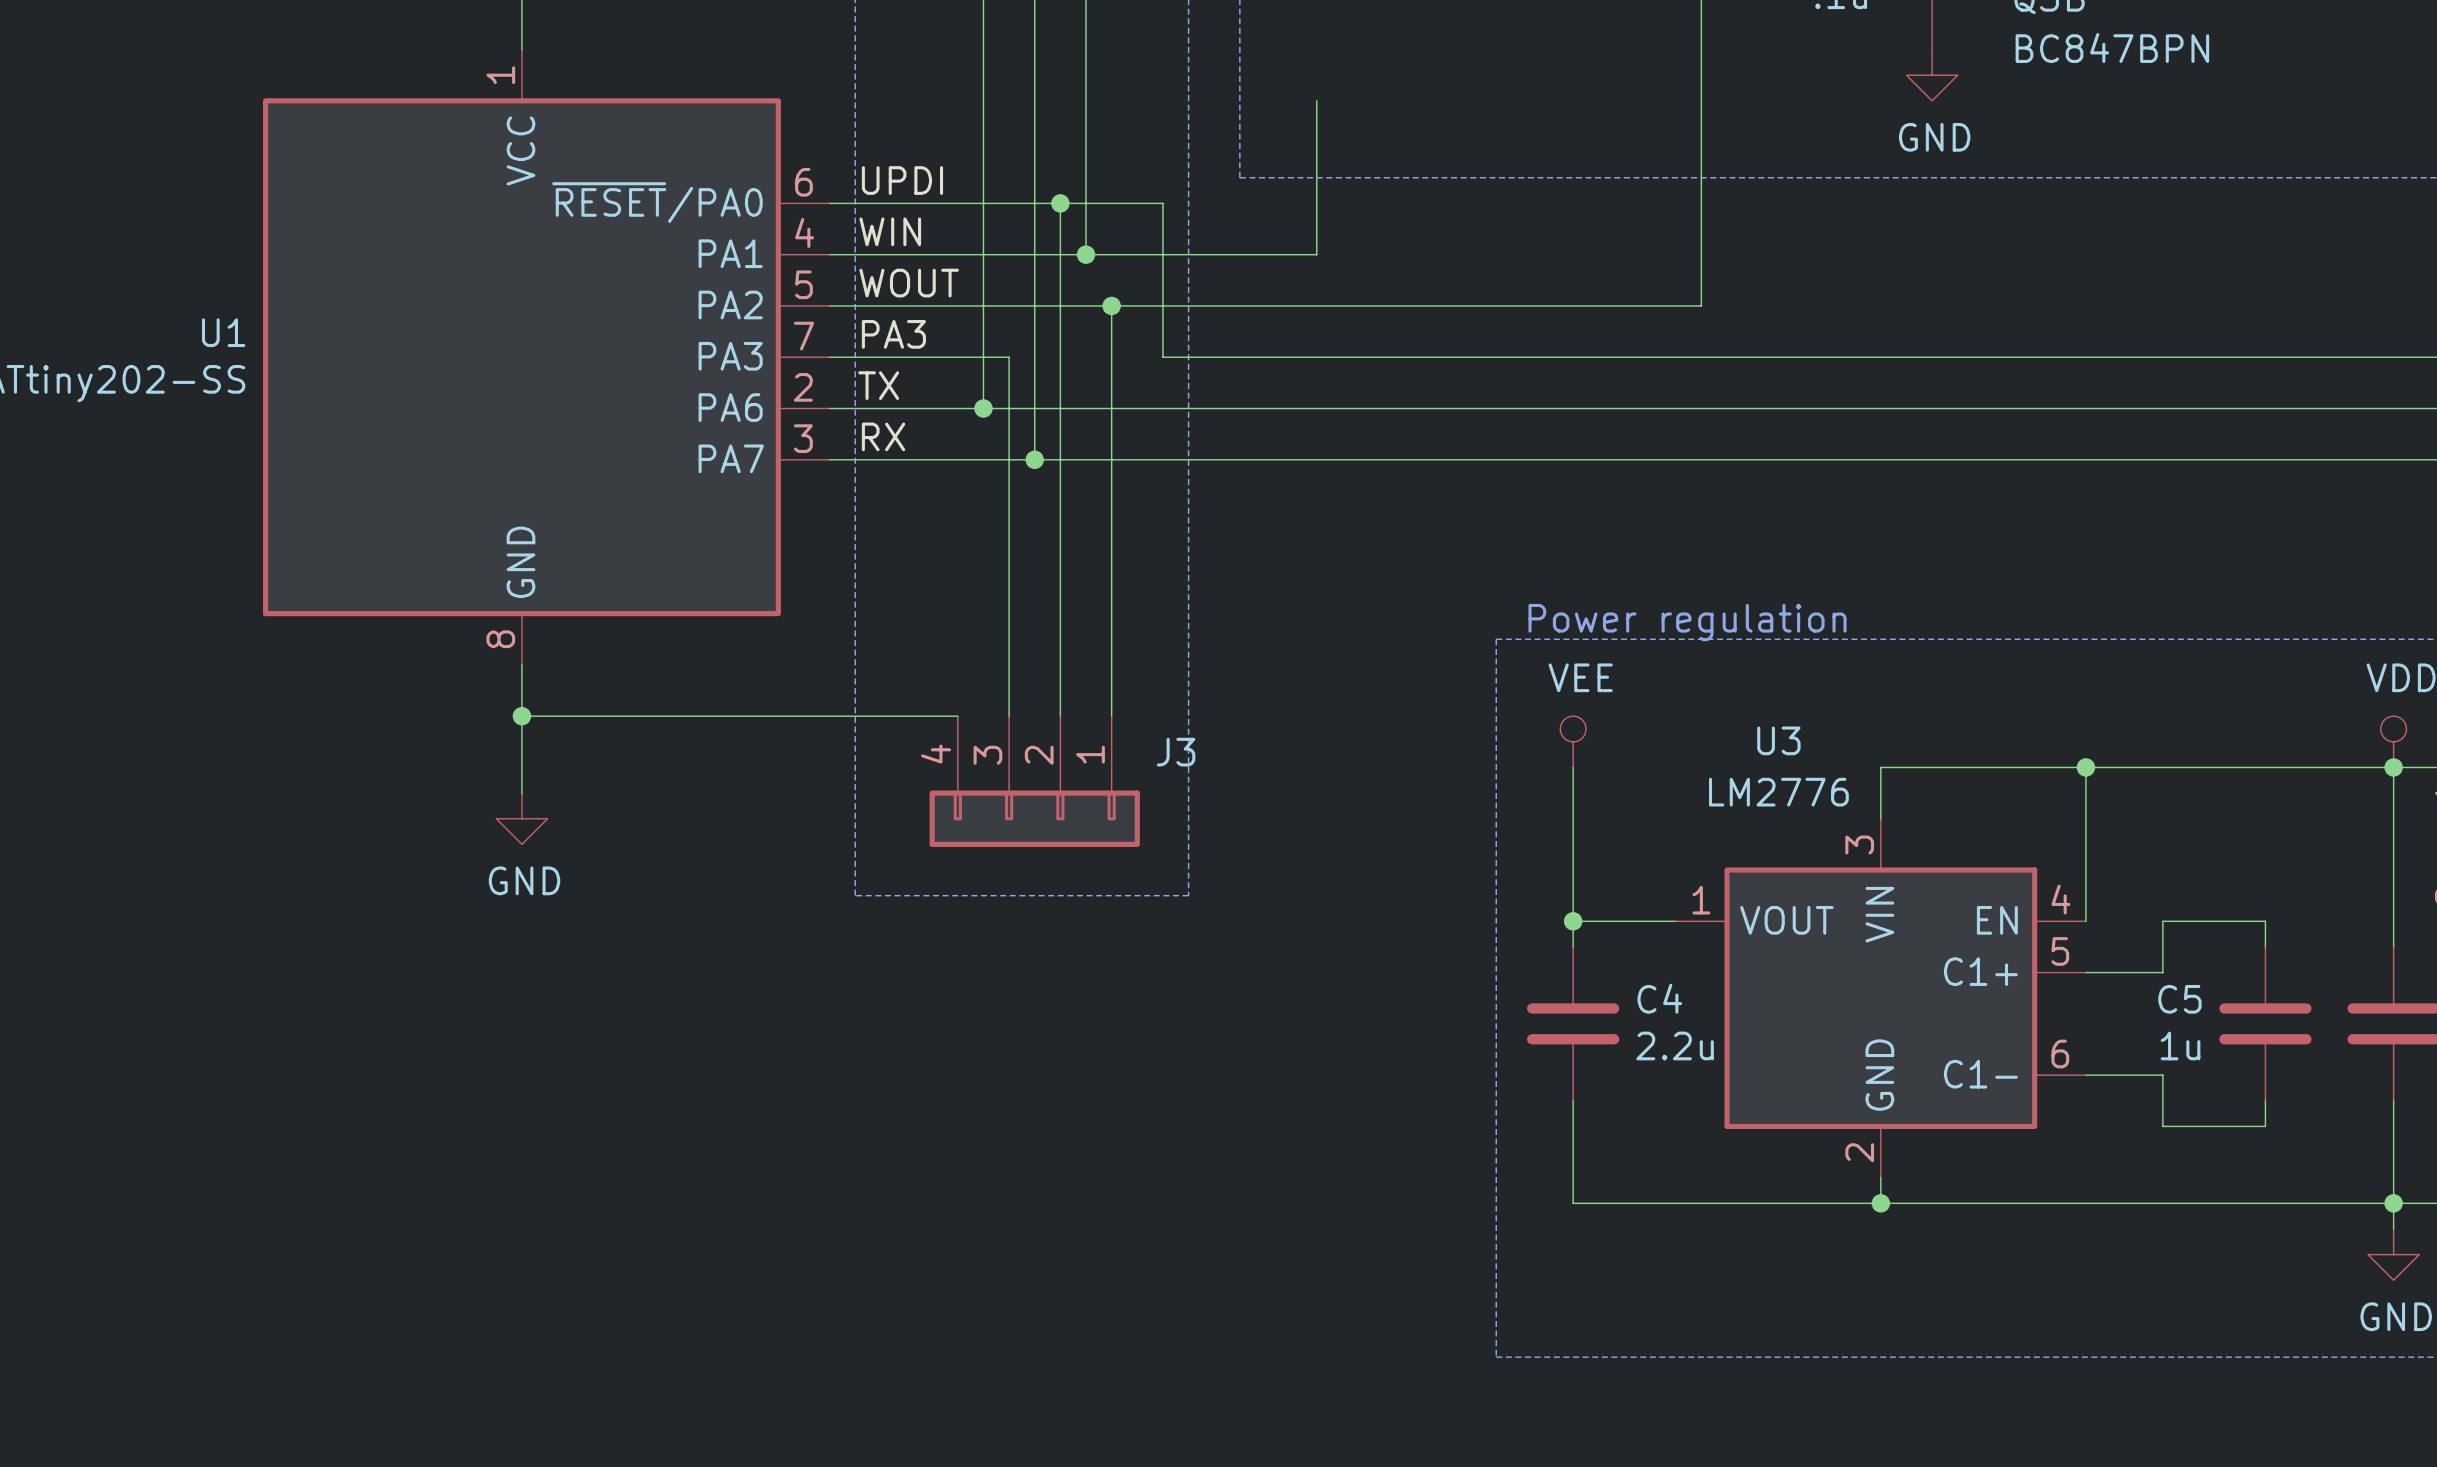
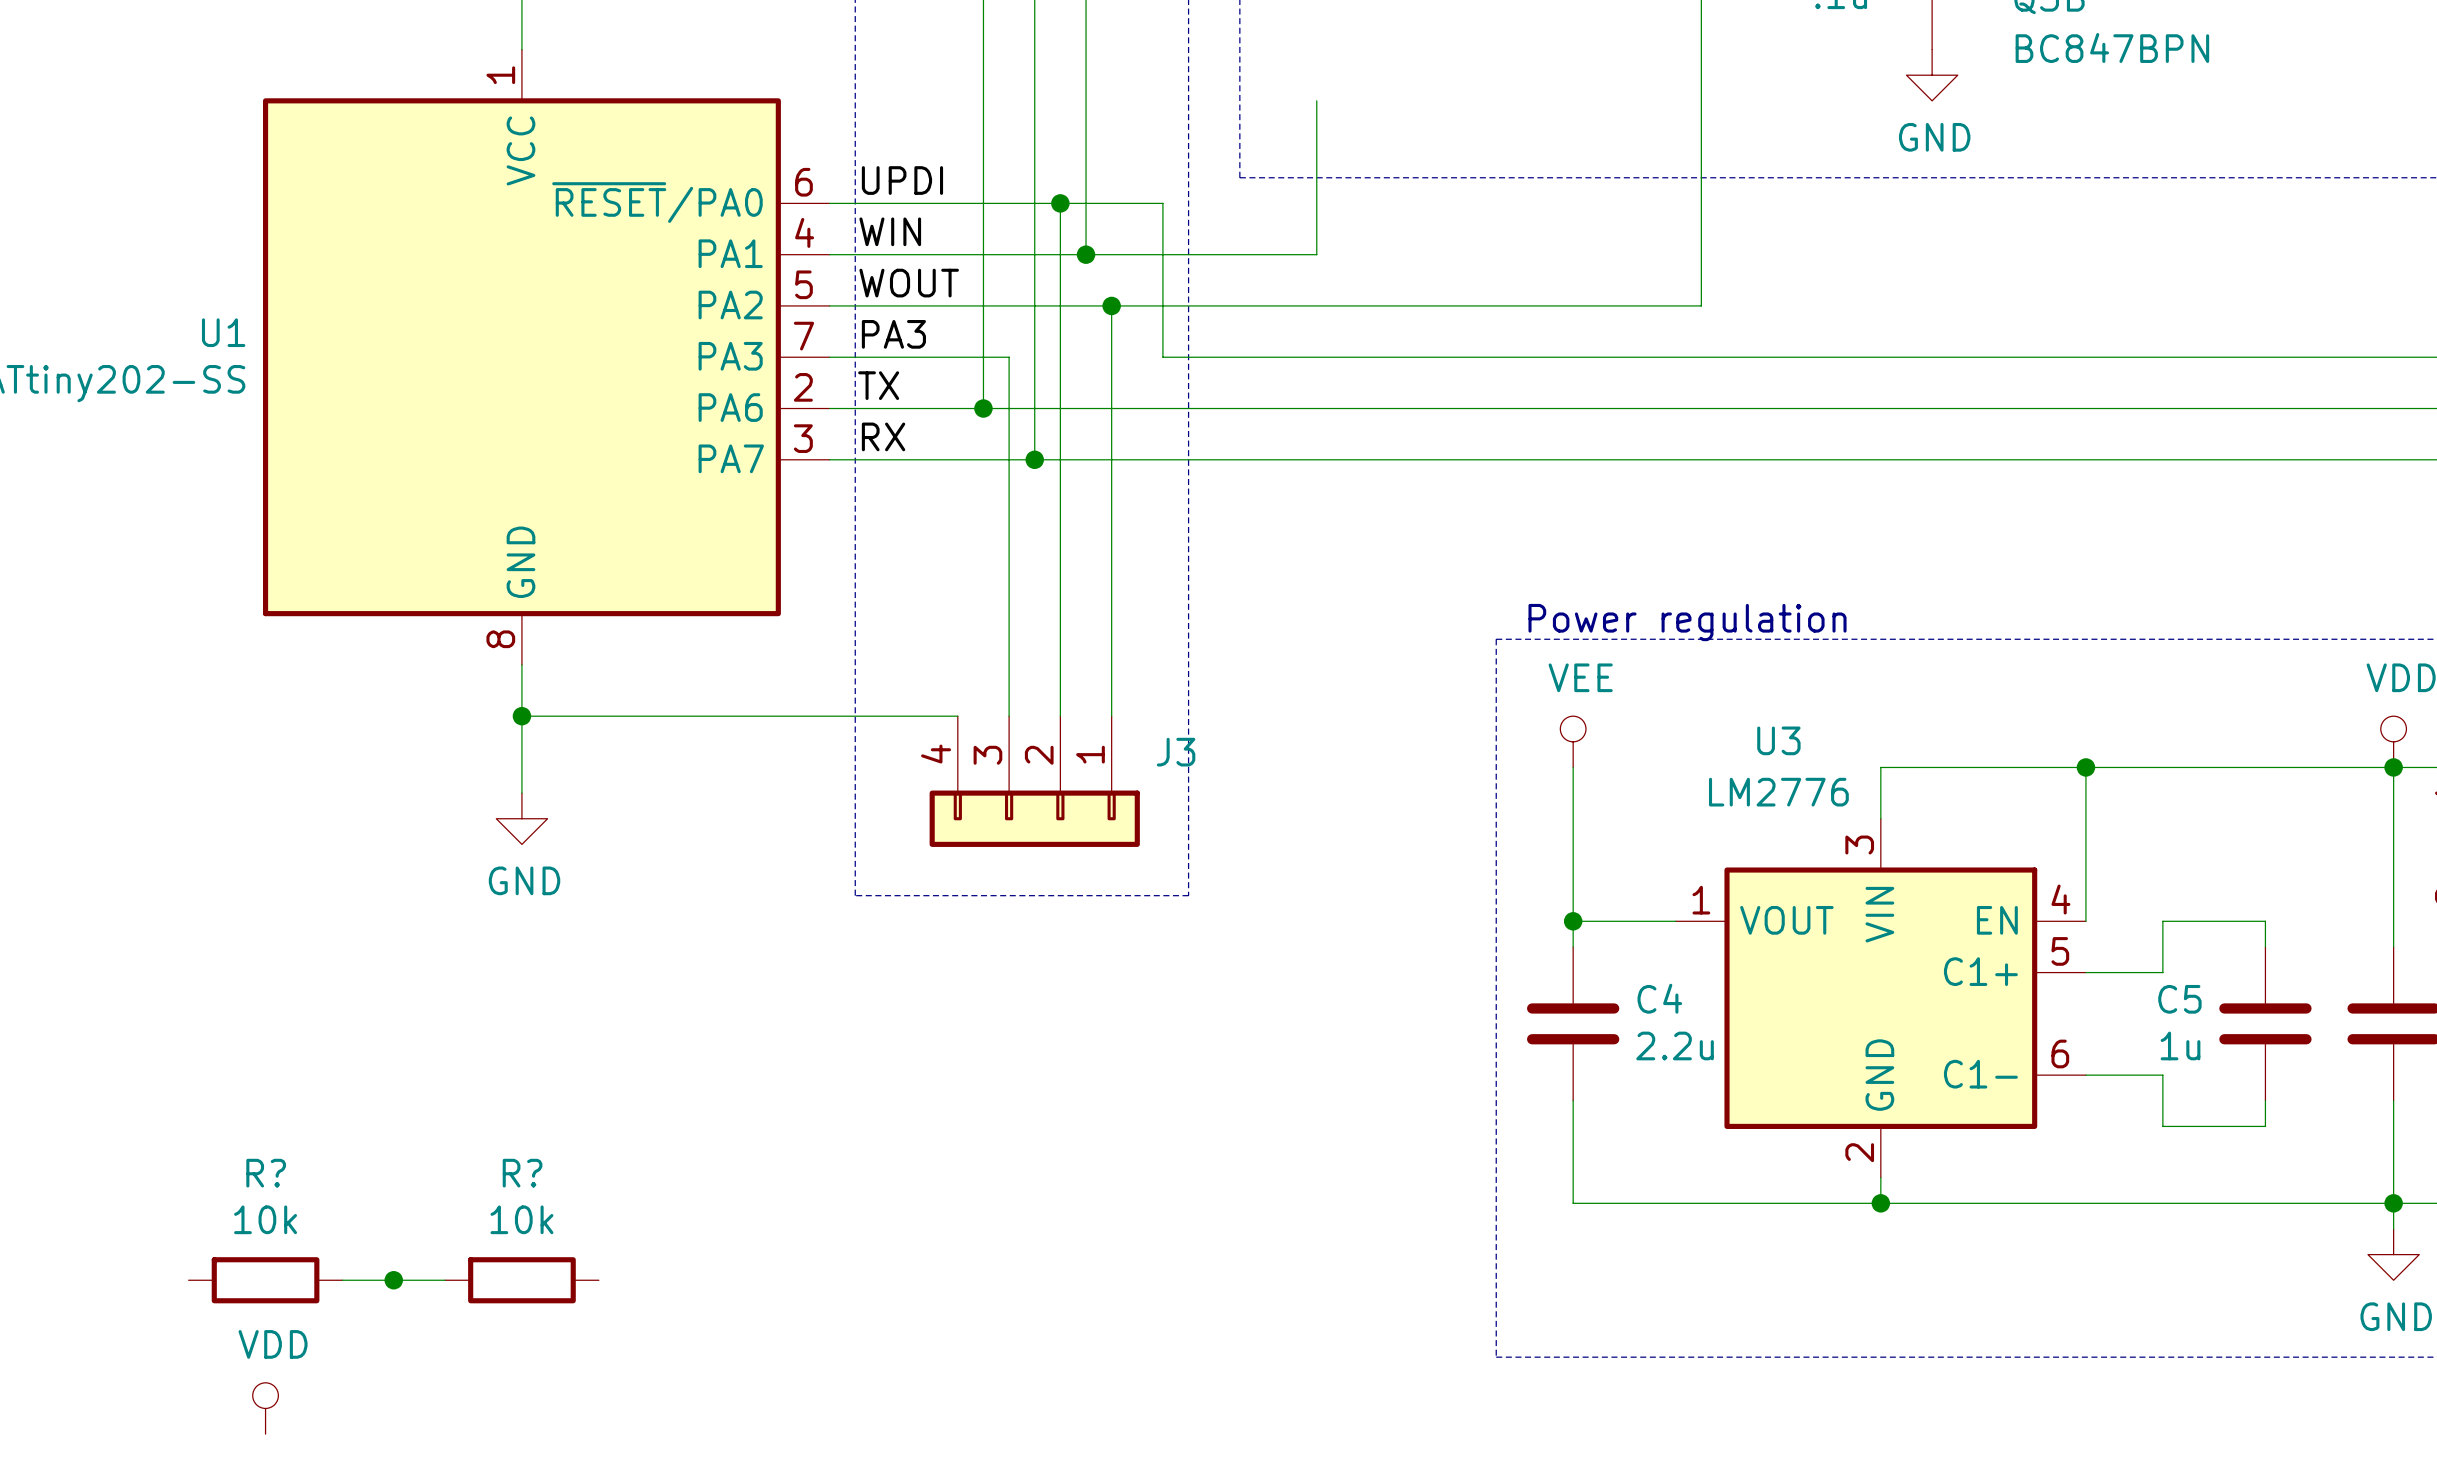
R?: none -> 10k (265, 1280)
wire: none -> (342, 1280) (445, 1280)
junction: none -> (393, 1280)
R?: none -> 10k (521, 1280)
power symbol: none -> VDD (265, 1408)

